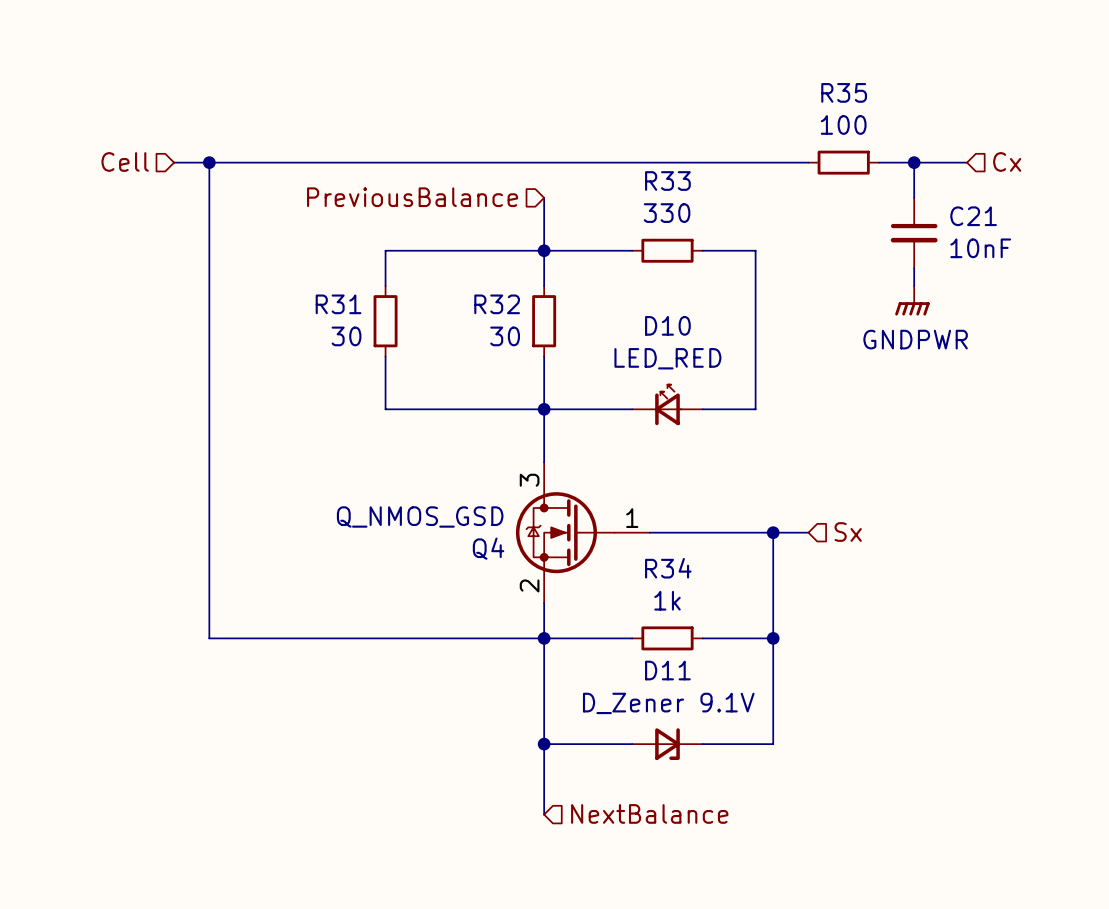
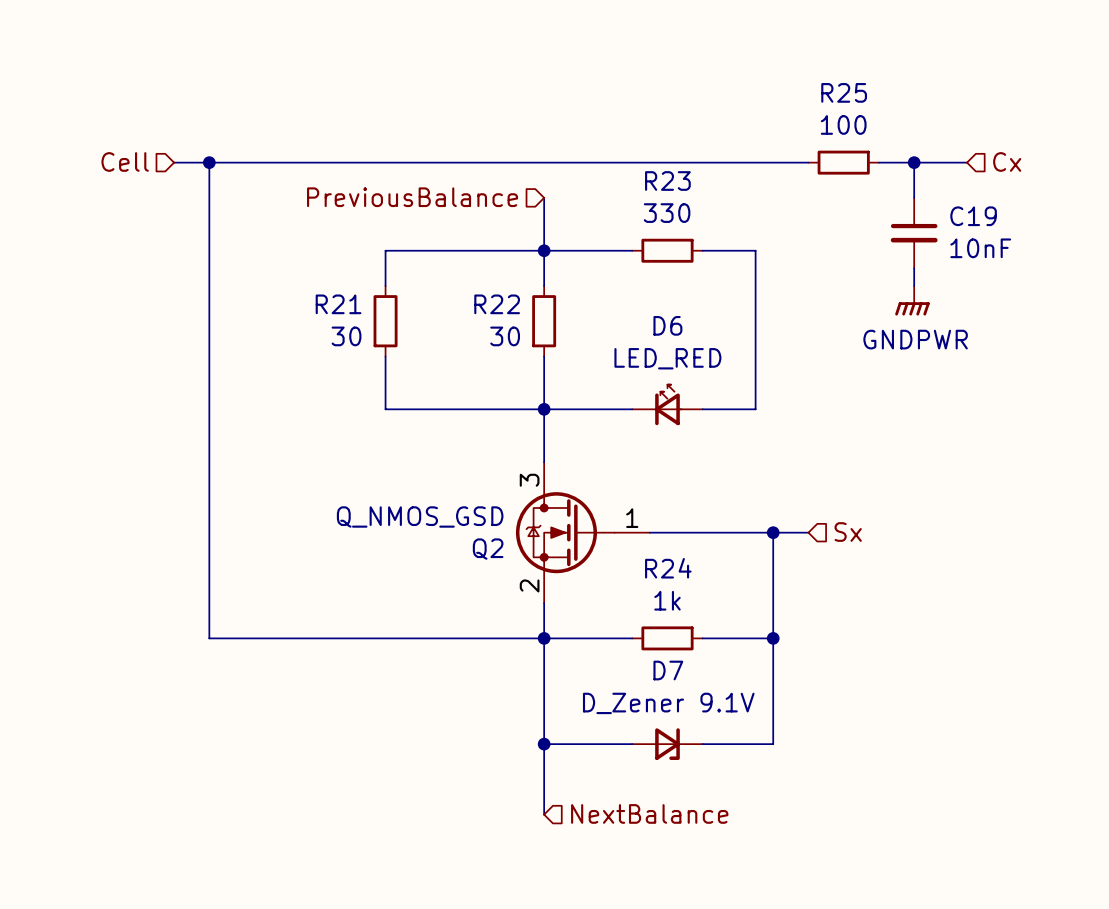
R35 name: R35 (844, 92) -> R25 (844, 92)
R33 name: R33 (667, 181) -> R23 (667, 181)
C21 name: C21 (973, 216) -> C19 (973, 216)
R31 name: R31 (338, 304) -> R21 (338, 304)
R32 name: R32 (497, 304) -> R22 (497, 304)
D10 name: D10 (667, 325) -> D6 (667, 325)
Q4 name: Q4 (488, 548) -> Q2 (488, 549)
R34 name: R34 (668, 568) -> R24 (668, 568)
D11 name: D11 (667, 670) -> D7 (668, 670)

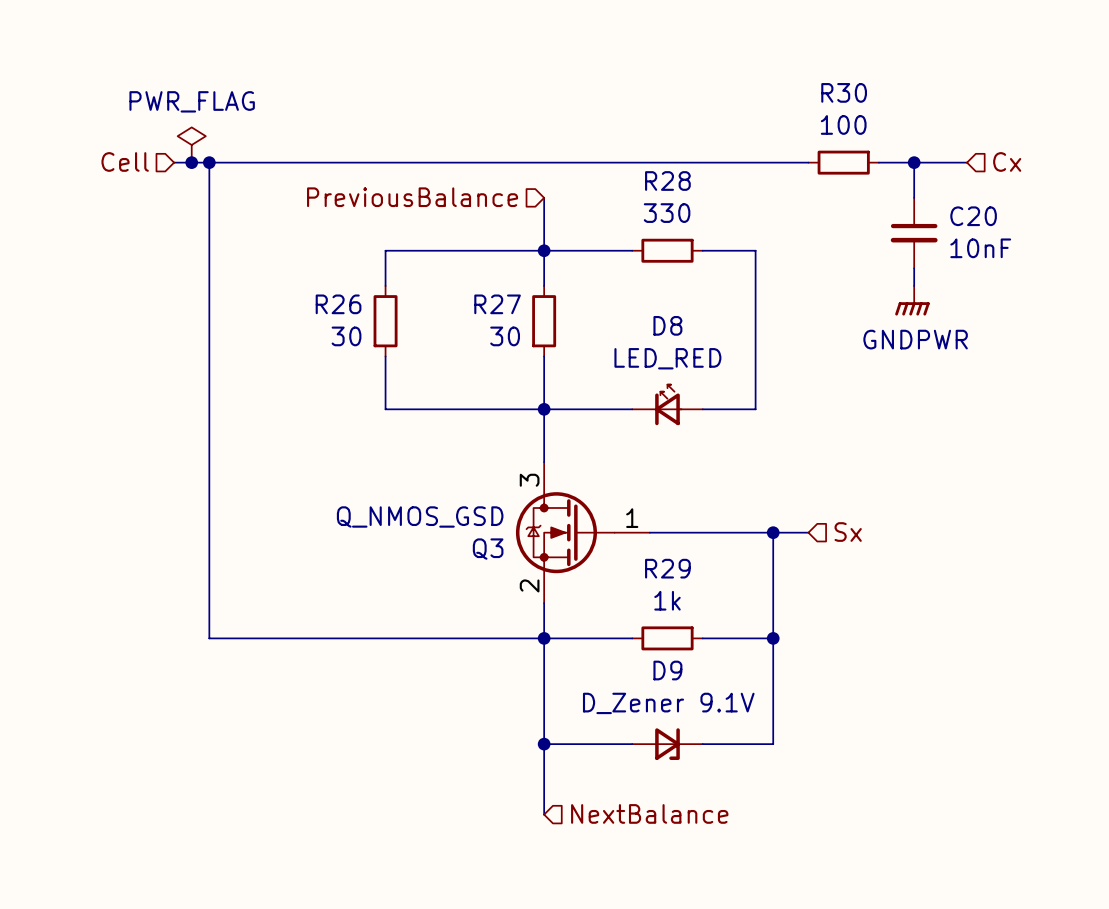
R25 name: R25 (844, 92) -> R30 (844, 92)
power symbol: none -> PWR_FLAG (191, 145)
junction: none -> (191, 162)
R23 name: R23 (667, 181) -> R28 (667, 181)
C19 name: C19 (973, 216) -> C20 (973, 216)
R21 name: R21 (338, 304) -> R26 (338, 304)
R22 name: R22 (497, 304) -> R27 (497, 304)
D6 name: D6 (667, 325) -> D8 (667, 325)
Q2 name: Q2 (488, 549) -> Q3 (488, 549)
R24 name: R24 (668, 568) -> R29 (667, 568)
D7 name: D7 (668, 670) -> D9 (667, 670)

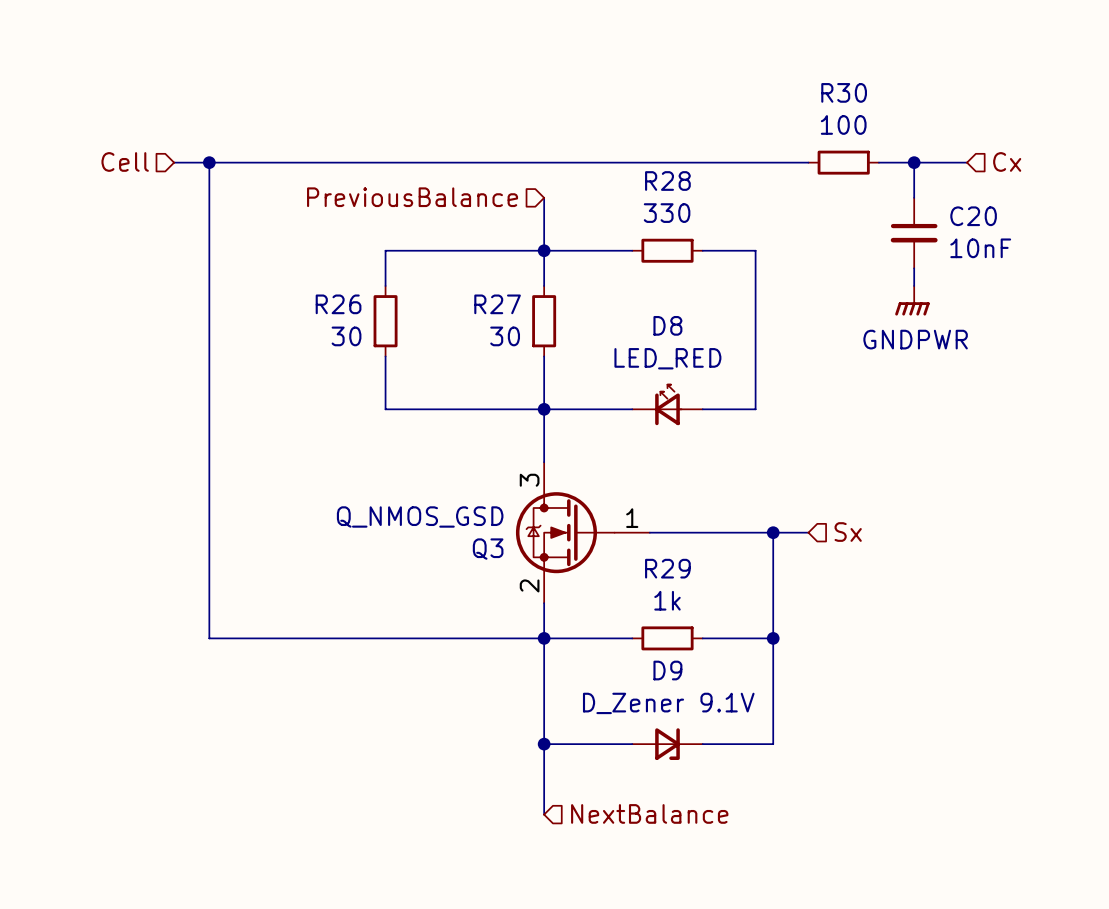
power symbol: PWR_FLAG (191, 145) -> none
junction: (191, 162) -> none

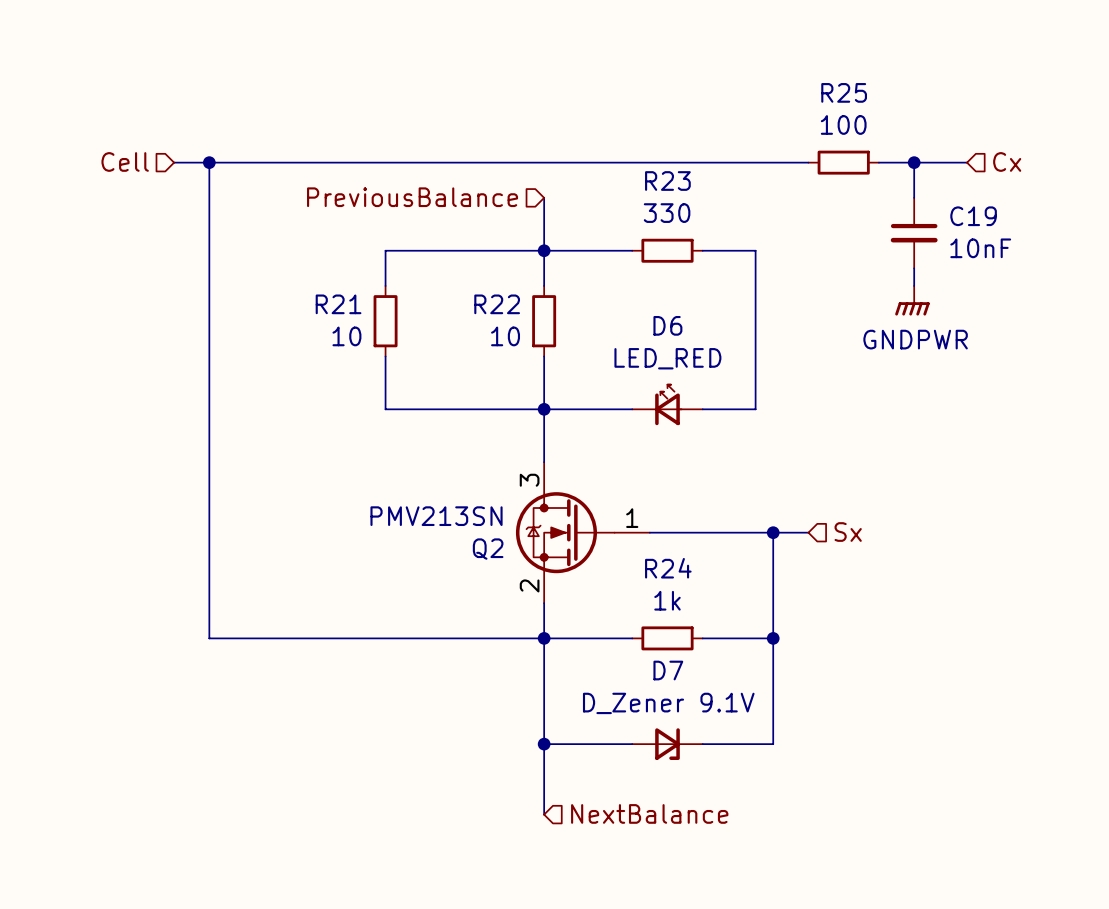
R30 name: R30 (844, 92) -> R25 (844, 92)
R28 name: R28 (667, 181) -> R23 (667, 181)
C20 name: C20 (973, 216) -> C19 (973, 216)
R26 name: R26 (338, 304) -> R21 (338, 304)
R27 name: R27 (497, 304) -> R22 (497, 304)
D8 name: D8 (667, 325) -> D6 (667, 325)
R26 value: 30 (346, 336) -> 10 (346, 336)
R27 value: 30 (505, 336) -> 10 (505, 336)
Q3 value: Q_NMOS_GSD (420, 516) -> PMV213SN (436, 516)
Q3 name: Q3 (488, 549) -> Q2 (488, 549)
R29 name: R29 (667, 568) -> R24 (668, 568)
D9 name: D9 (667, 670) -> D7 (668, 670)

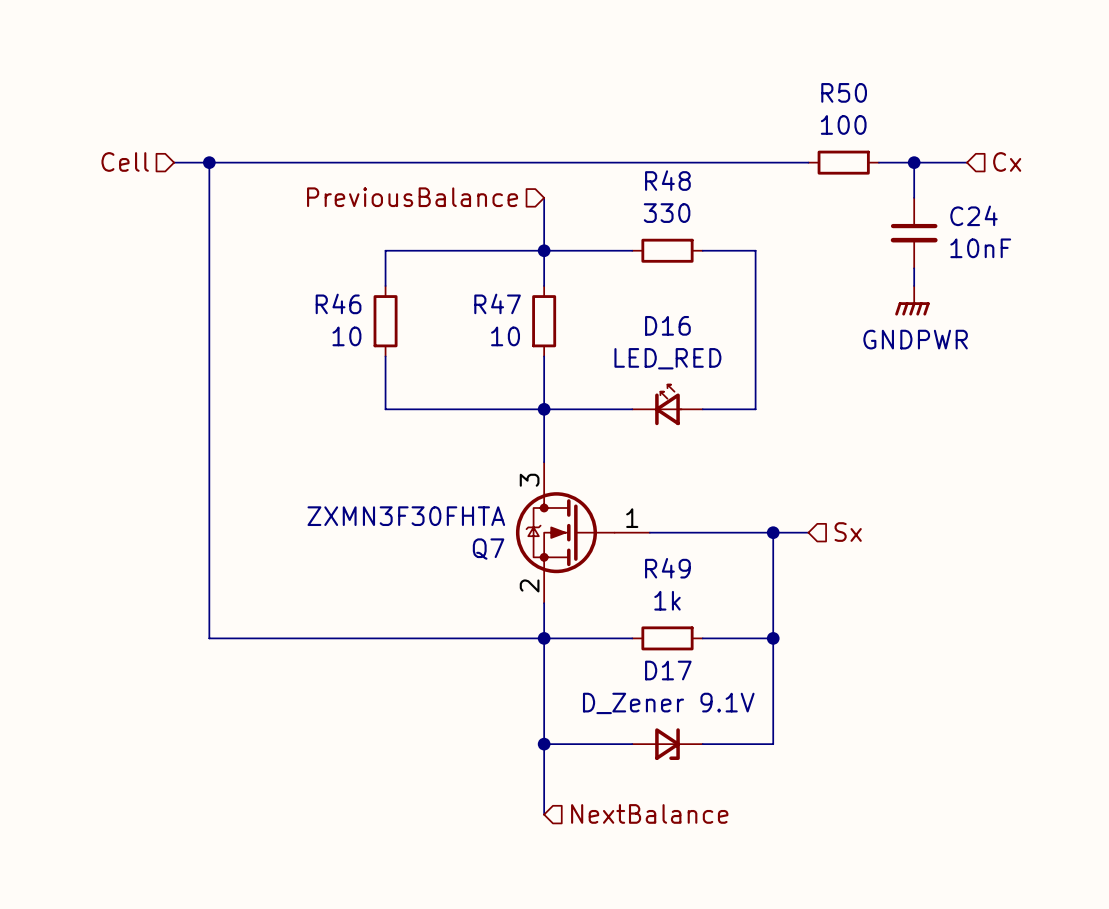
R25 name: R25 (844, 92) -> R50 (844, 92)
R23 name: R23 (667, 181) -> R48 (667, 180)
C19 name: C19 (973, 216) -> C24 (974, 215)
R21 name: R21 (338, 304) -> R46 (338, 303)
R22 name: R22 (497, 304) -> R47 (497, 303)
D6 name: D6 (667, 325) -> D16 (667, 325)
Q2 value: PMV213SN (436, 516) -> ZXMN3F30FHTA (406, 516)
Q2 name: Q2 (488, 549) -> Q7 (488, 549)
R24 name: R24 (668, 568) -> R49 (667, 568)
D7 name: D7 (668, 670) -> D17 (668, 670)

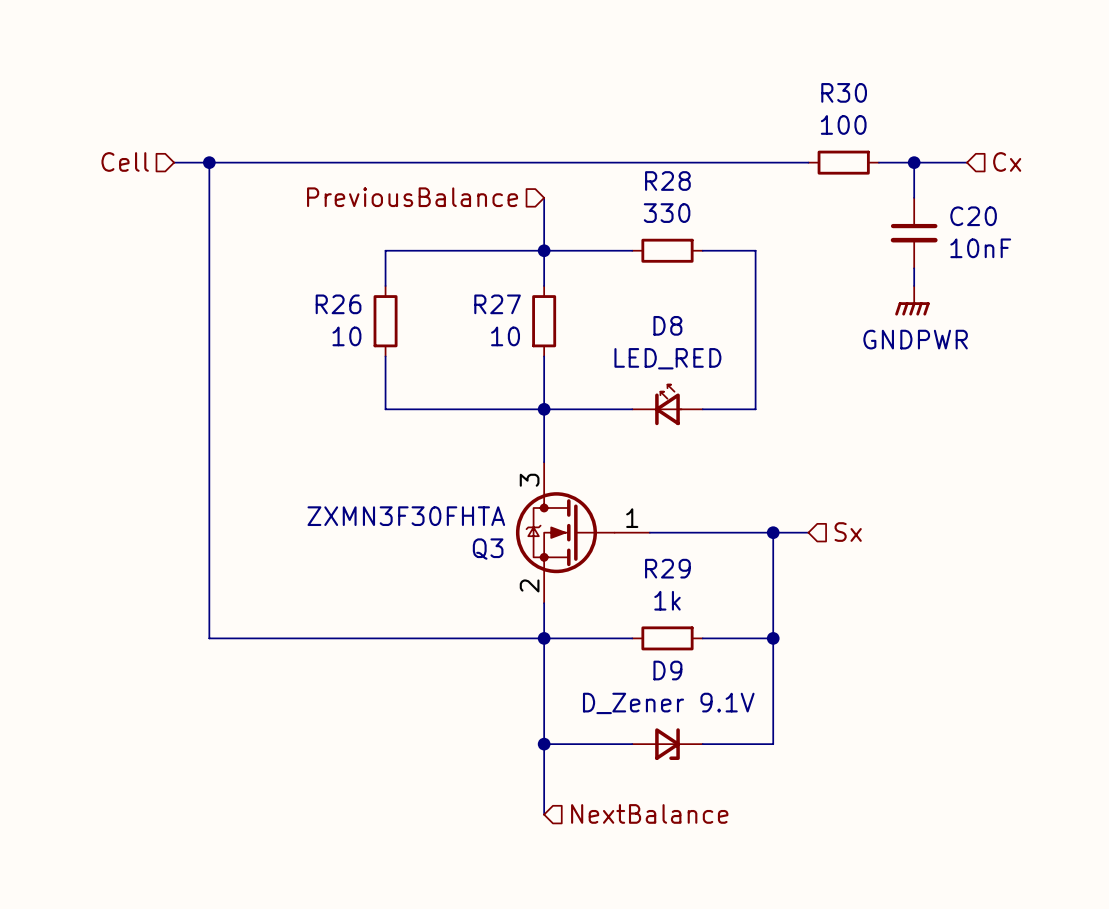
R50 name: R50 (844, 92) -> R30 (844, 92)
R48 name: R48 (667, 180) -> R28 (667, 181)
C24 name: C24 (974, 215) -> C20 (973, 216)
R46 name: R46 (338, 303) -> R26 (338, 304)
R47 name: R47 (497, 303) -> R27 (497, 304)
D16 name: D16 (667, 325) -> D8 (667, 325)
Q7 name: Q7 (488, 549) -> Q3 (488, 549)
R49 name: R49 (667, 568) -> R29 (667, 568)
D17 name: D17 (668, 670) -> D9 (667, 670)

